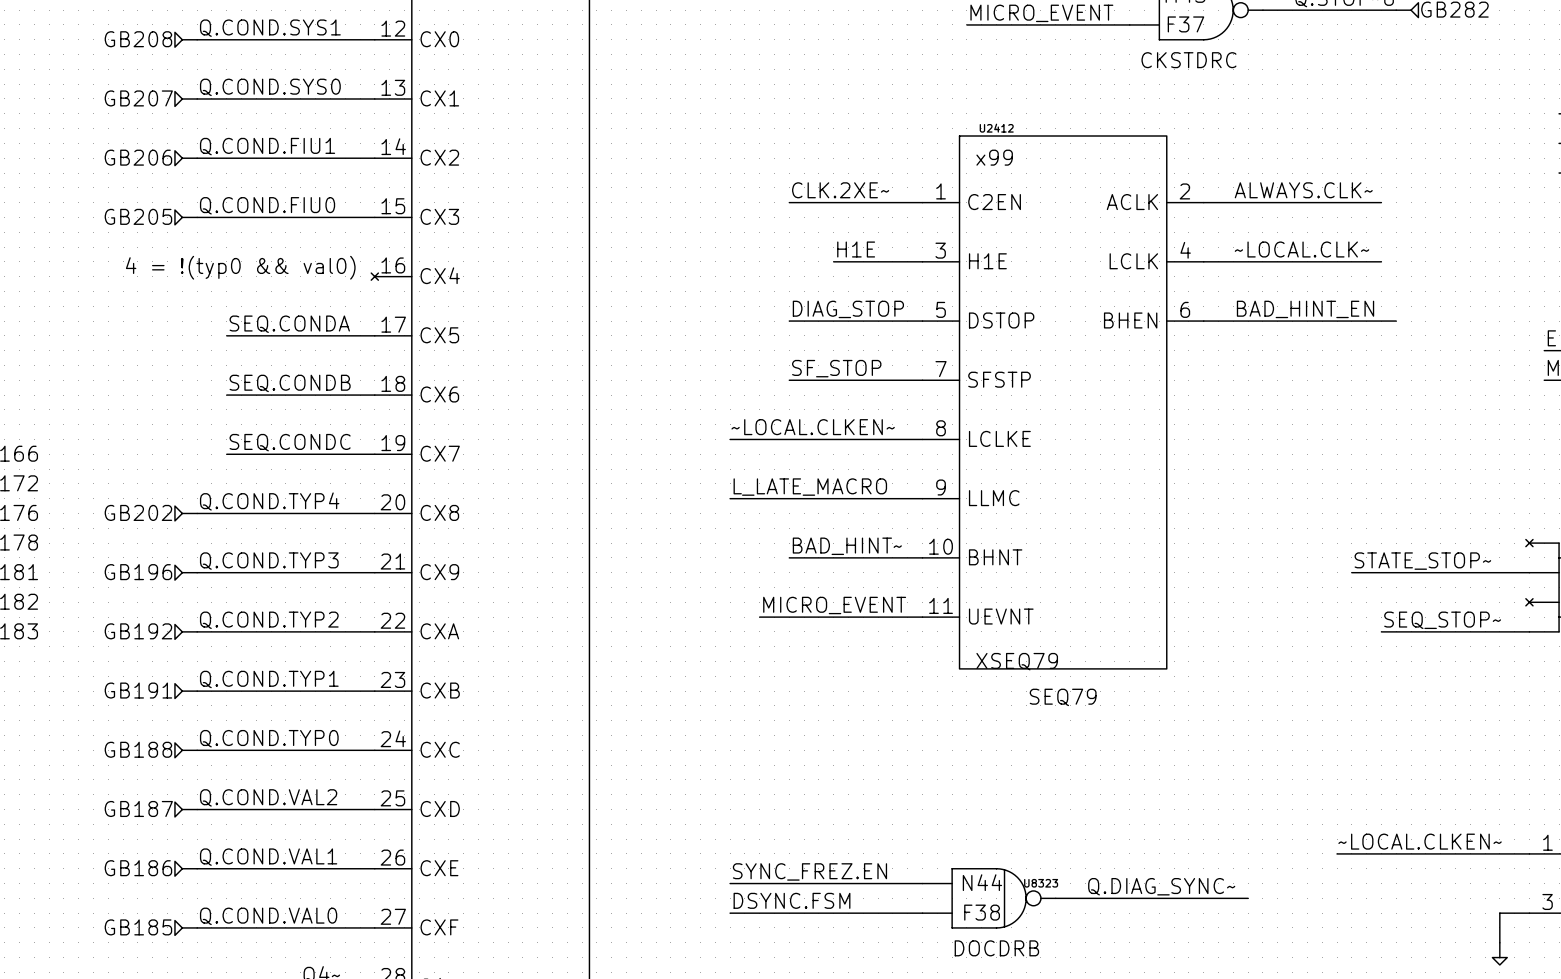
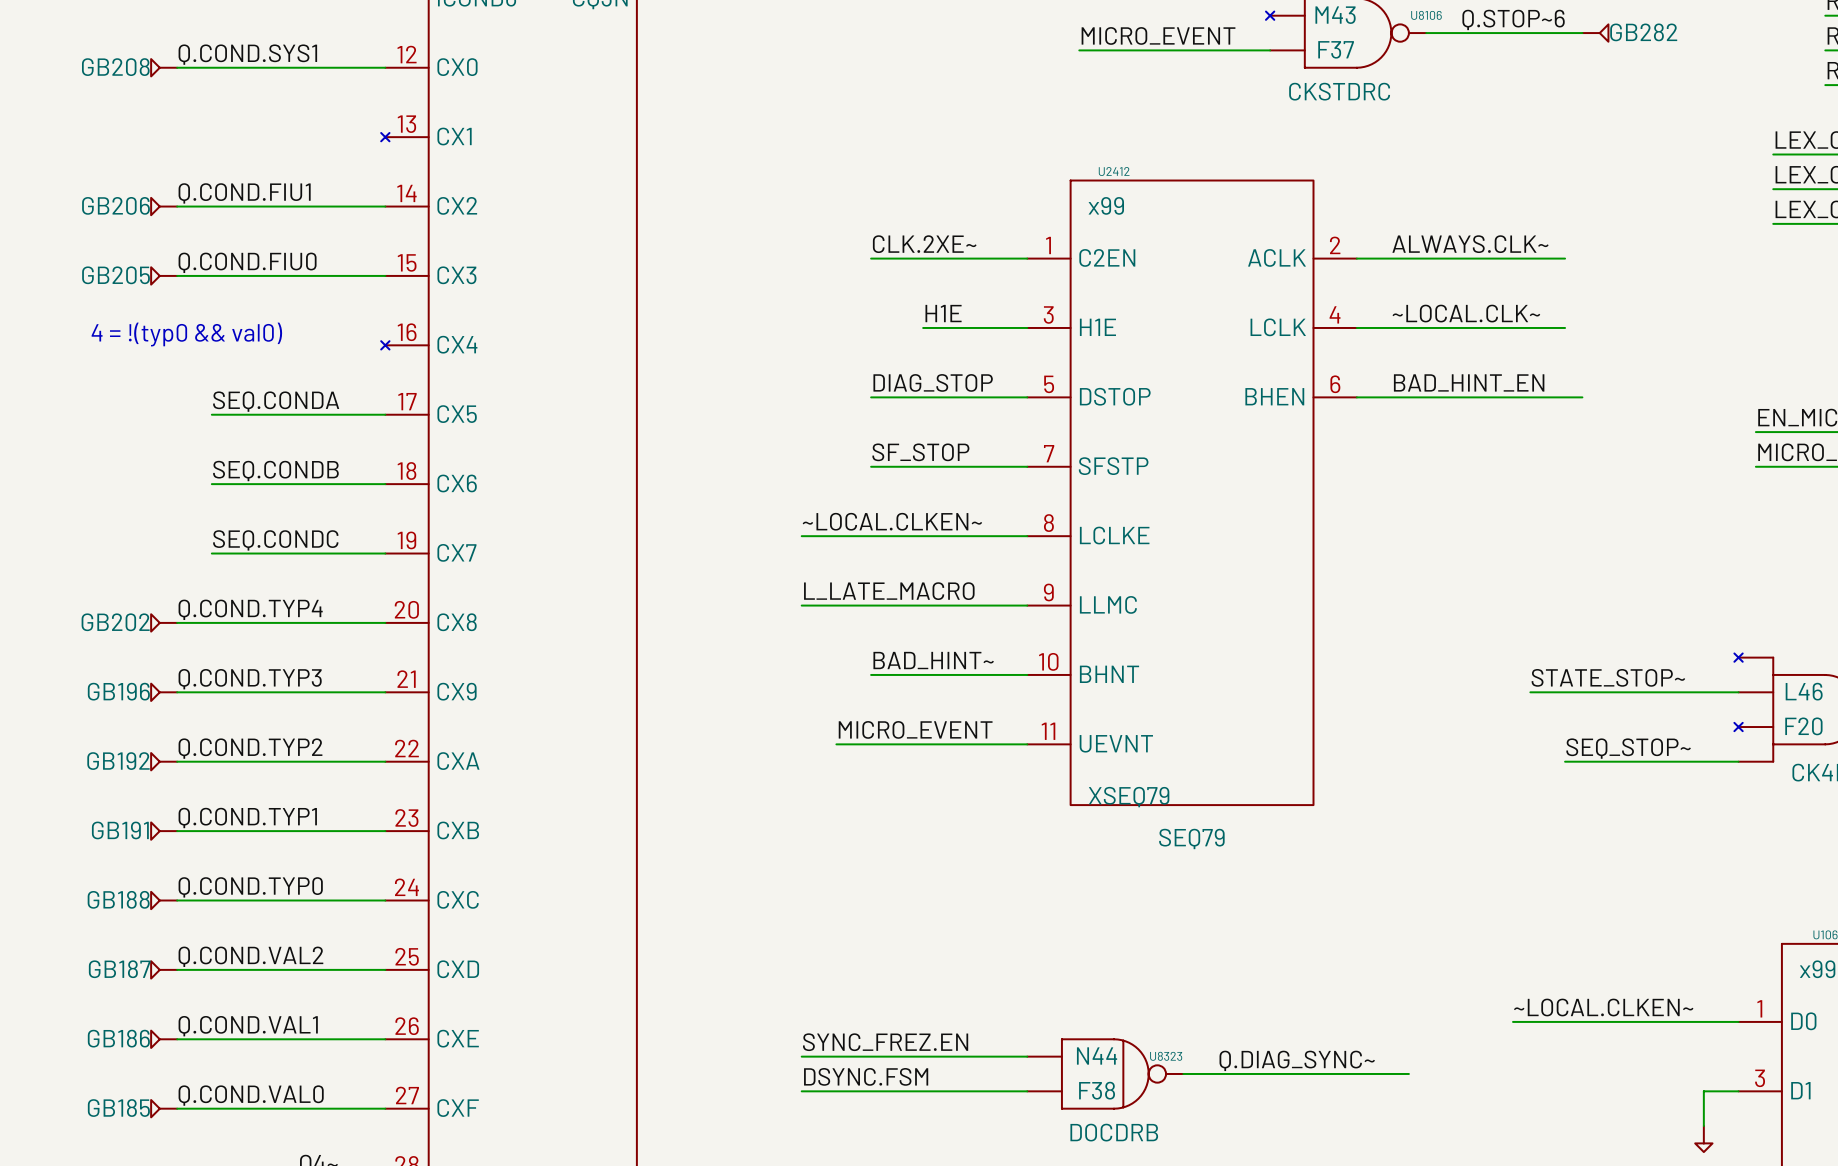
label: Q.COND.SYS0 (270, 87) -> none
GB207: (185, 98) -> none
wire: (197, 98) (374, 98) -> none
no-connect mark: none -> (385, 137)

